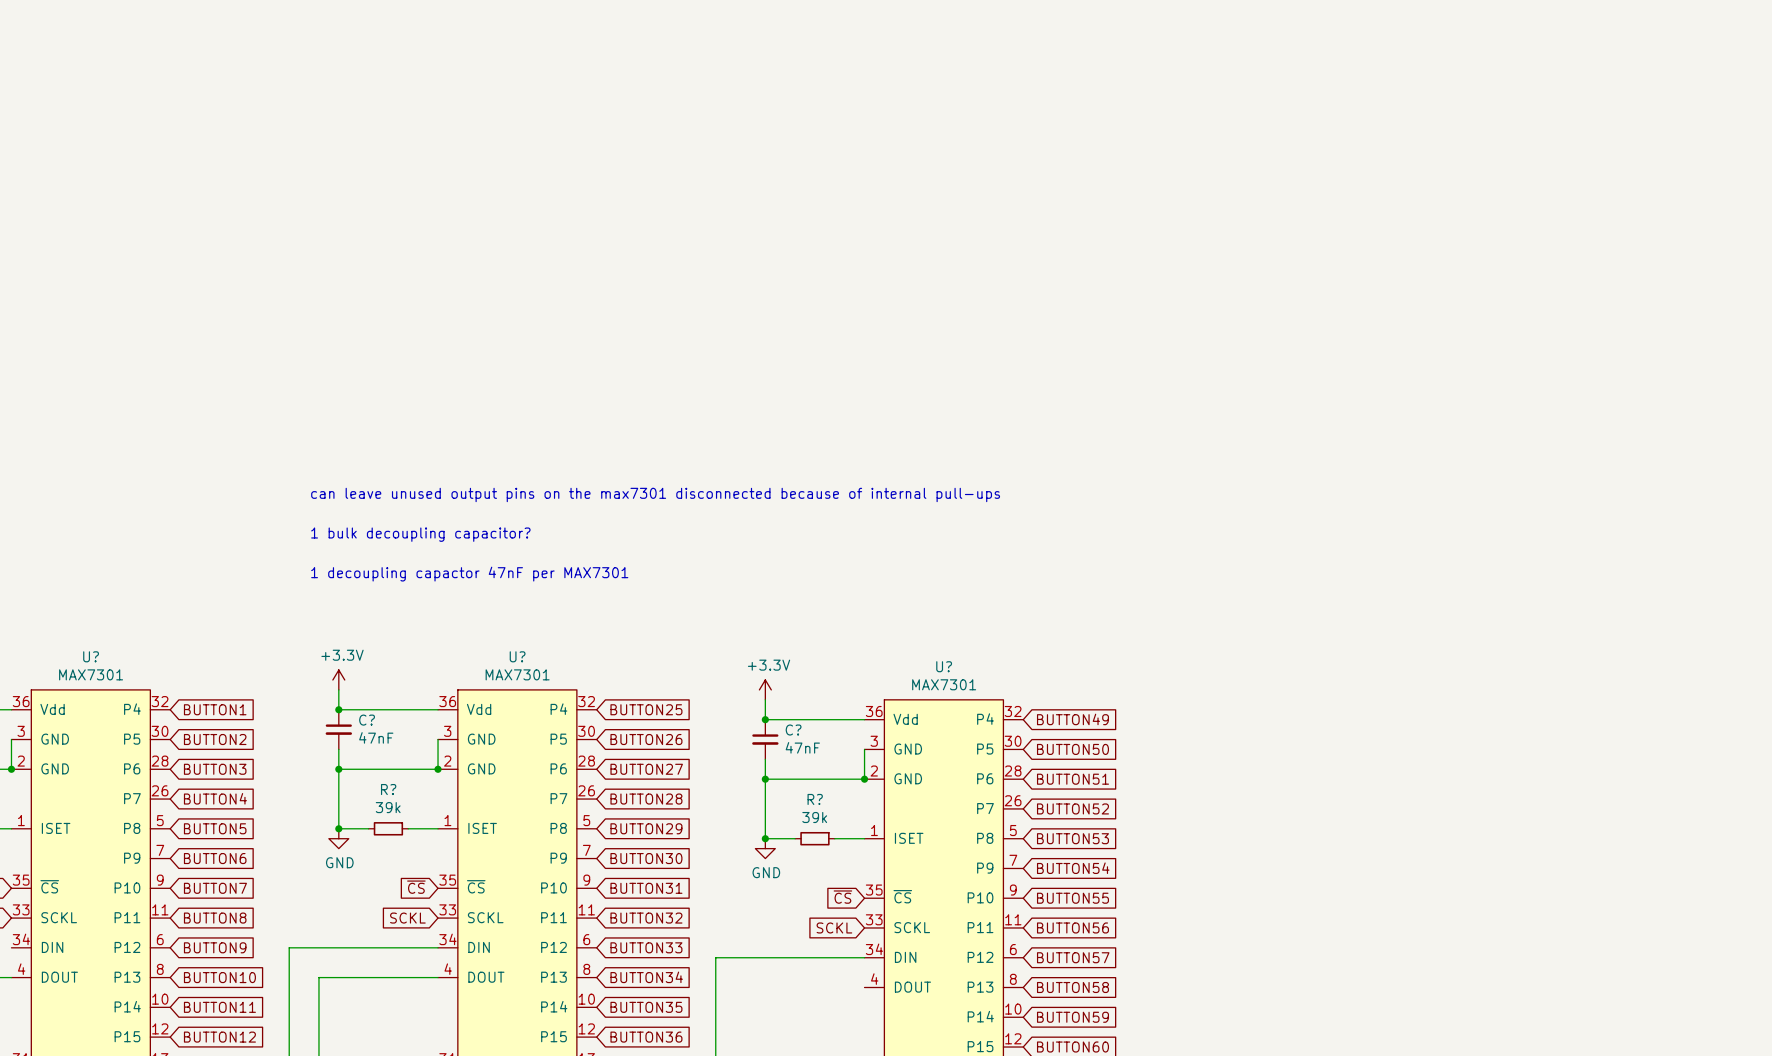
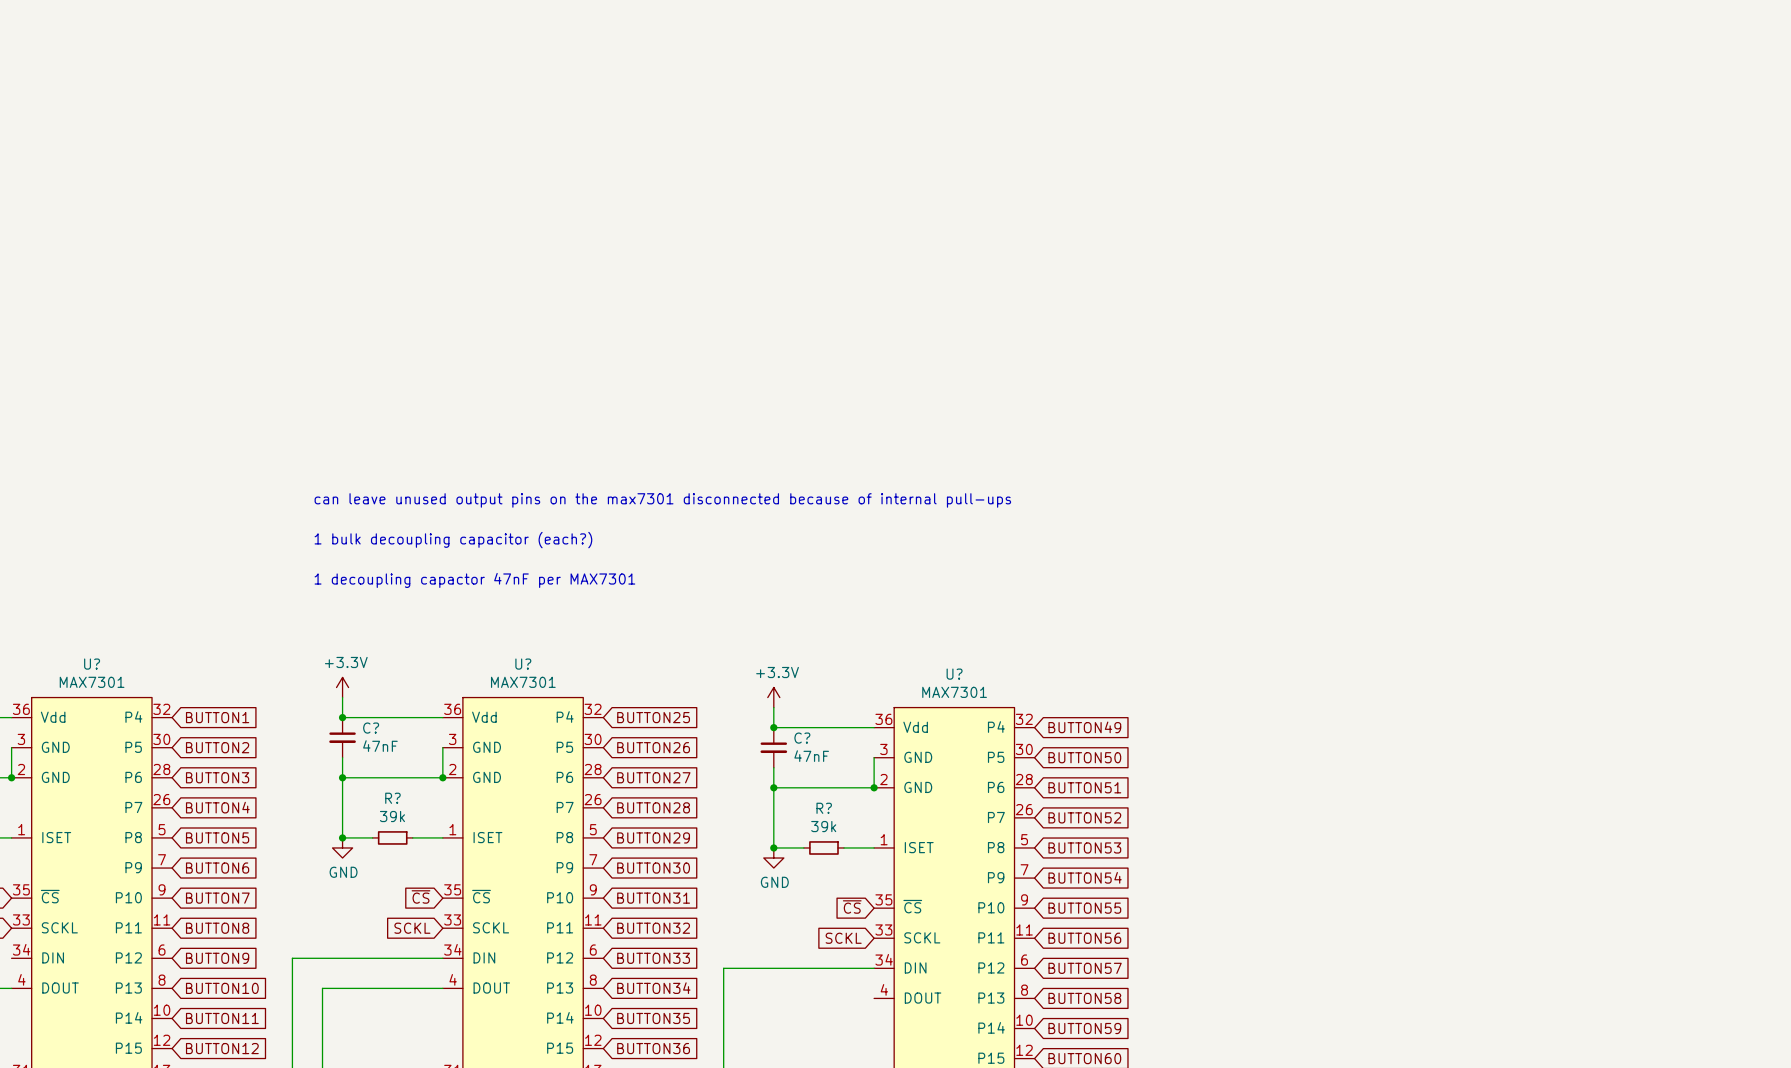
text: 1 bulk decoupling capacitor? (420, 534) -> 1 bulk decoupling capacitor (each?) (453, 540)

